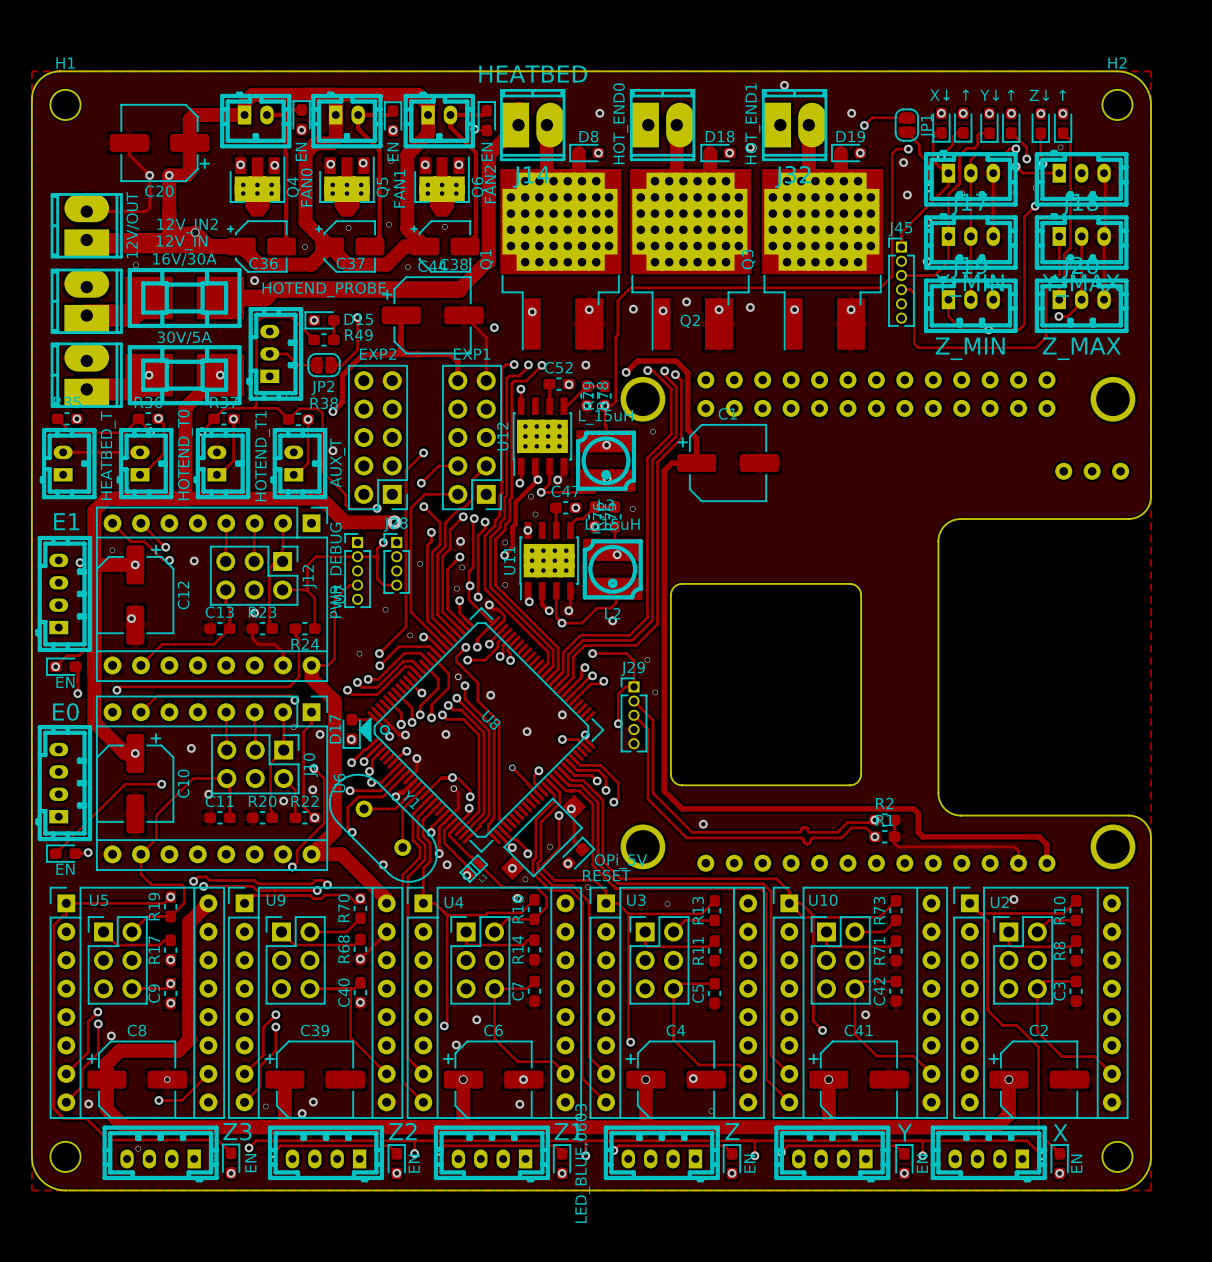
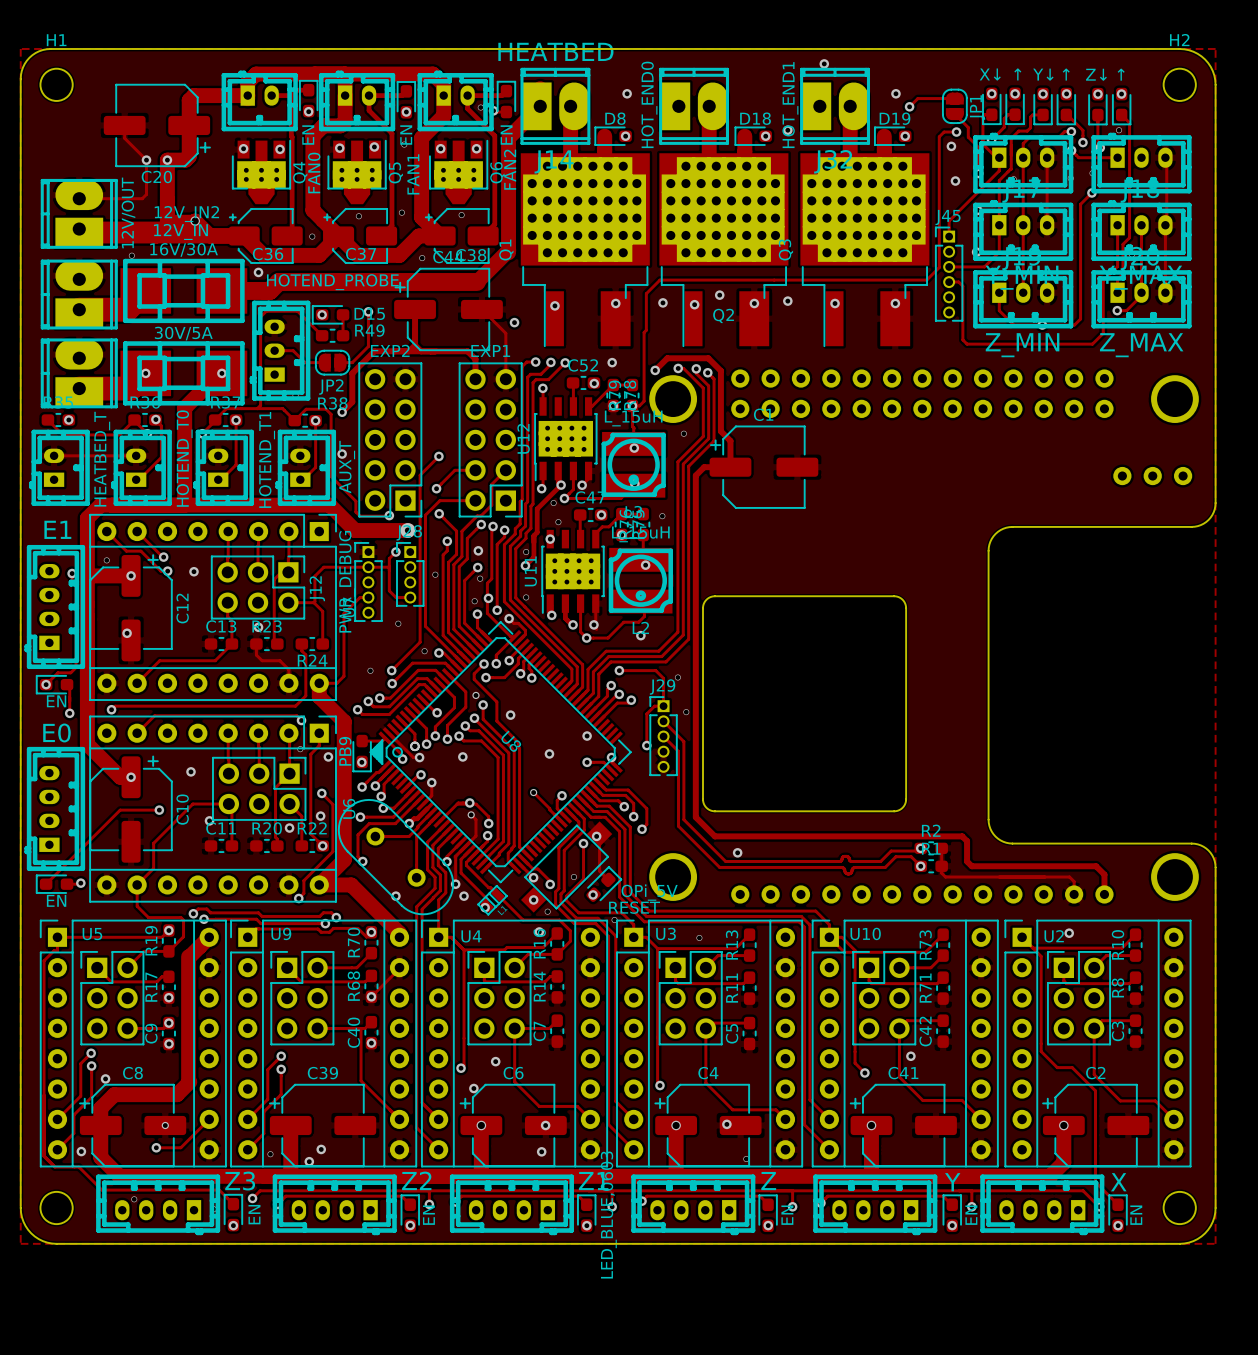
via: none -> (480, 107)
D17 name: D17 (335, 729) -> none
D17 value: none -> PB9 (345, 751)
J10 name: J10 (310, 765) -> none
Y1 name: Y1 (411, 799) -> none

